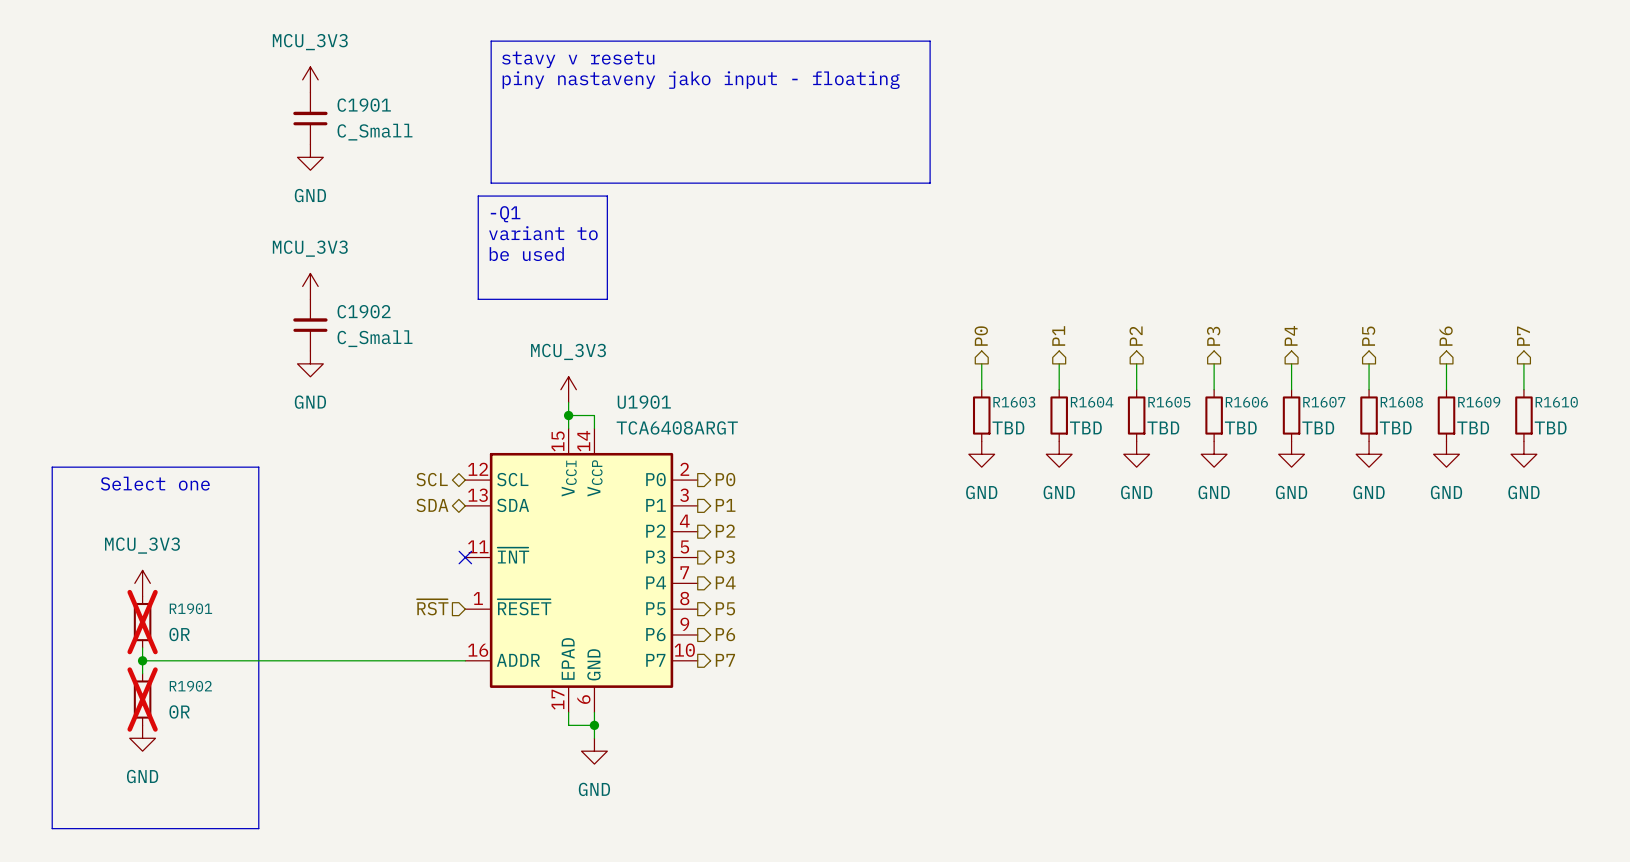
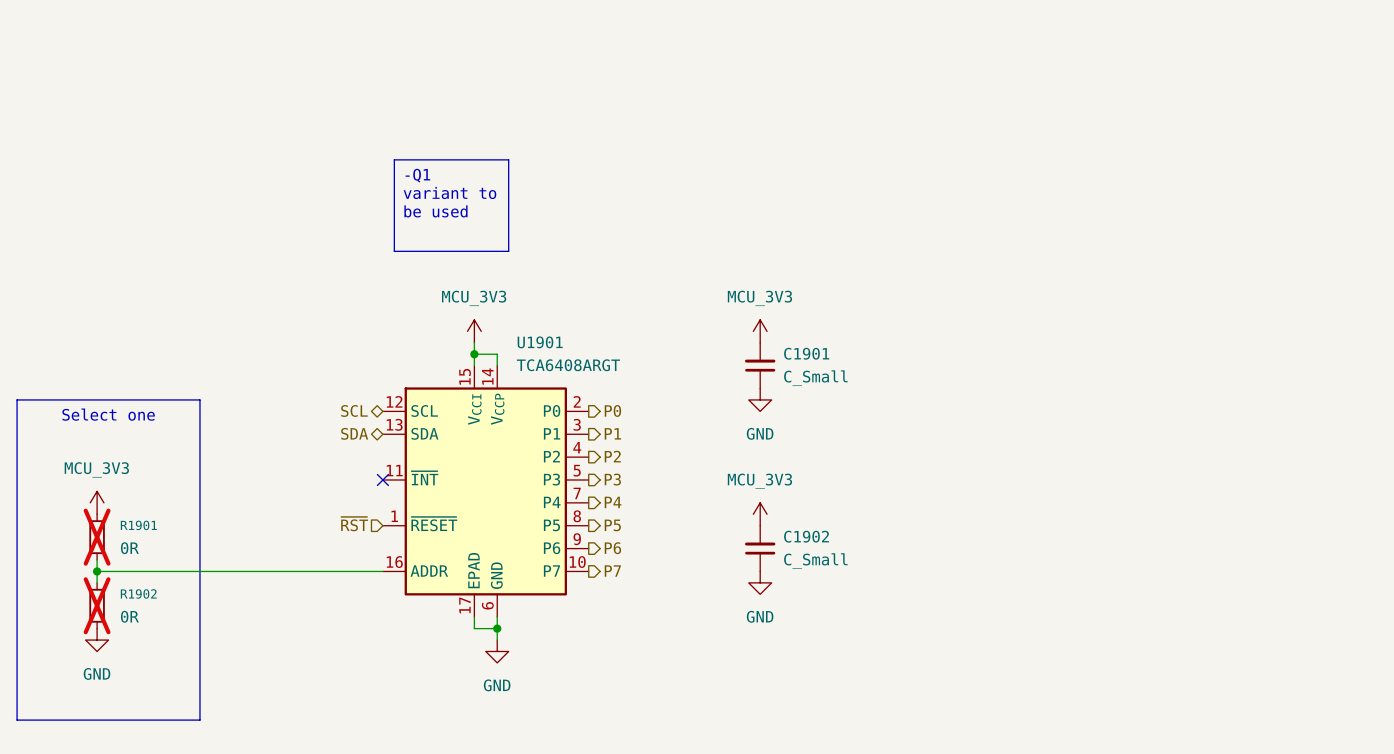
line: (491, 41) (930, 41) (930, 183) (491, 183) (491, 41) -> none
text: stavy v resetu (578, 59) -> none
power symbol: MCU_3V3 (310, 79) -> none
text: piny nastaveny jako input - floating (701, 80) -> none
C1901 position: (310, 118) -> (760, 365)
power symbol: GND (310, 157) -> none
power symbol: MCU_3V3 (310, 286) -> none
C1902 position: (310, 325) -> (760, 548)
hierarchical label: P1 (1058, 335) -> none
hierarchical label: P4 (1291, 335) -> none
hierarchical label: P0 (981, 336) -> none
hierarchical label: P2 (1136, 336) -> none
hierarchical label: P3 (1213, 336) -> none
hierarchical label: P5 (1368, 336) -> none
hierarchical label: P6 (1446, 336) -> none
hierarchical label: P7 (1523, 336) -> none
power symbol: GND (310, 363) -> none
wire: (981, 363) (981, 389) -> none
wire: (1059, 363) (1059, 389) -> none
wire: (1136, 363) (1136, 389) -> none
wire: (1214, 363) (1214, 389) -> none
wire: (1291, 363) (1291, 389) -> none
wire: (1369, 363) (1369, 389) -> none
wire: (1446, 363) (1446, 389) -> none
wire: (1523, 363) (1523, 389) -> none
power symbol: none -> MCU_3V3 (760, 331)
R1603: TBD (981, 415) -> none
R1604: TBD (1059, 415) -> none
R1605: TBD (1136, 415) -> none
R1606: TBD (1214, 415) -> none
R1607: TBD (1291, 415) -> none
R1608: TBD (1369, 415) -> none
R1609: TBD (1446, 415) -> none
R1610: TBD (1523, 415) -> none
power symbol: GND (981, 454) -> none
power symbol: GND (1059, 454) -> none
power symbol: GND (1136, 454) -> none
power symbol: GND (1214, 454) -> none
power symbol: GND (1291, 454) -> none
power symbol: GND (1369, 454) -> none
power symbol: GND (1446, 454) -> none
power symbol: GND (1523, 454) -> none
power symbol: none -> GND (760, 399)
power symbol: none -> MCU_3V3 (760, 514)
power symbol: none -> GND (760, 582)

